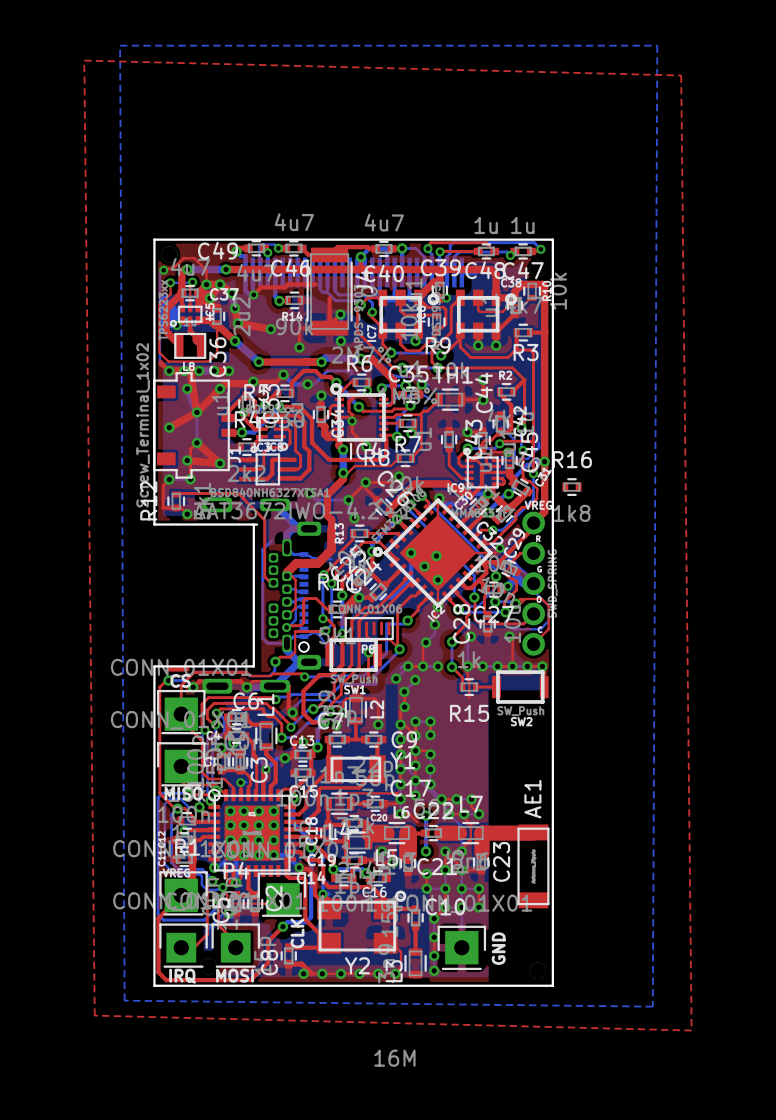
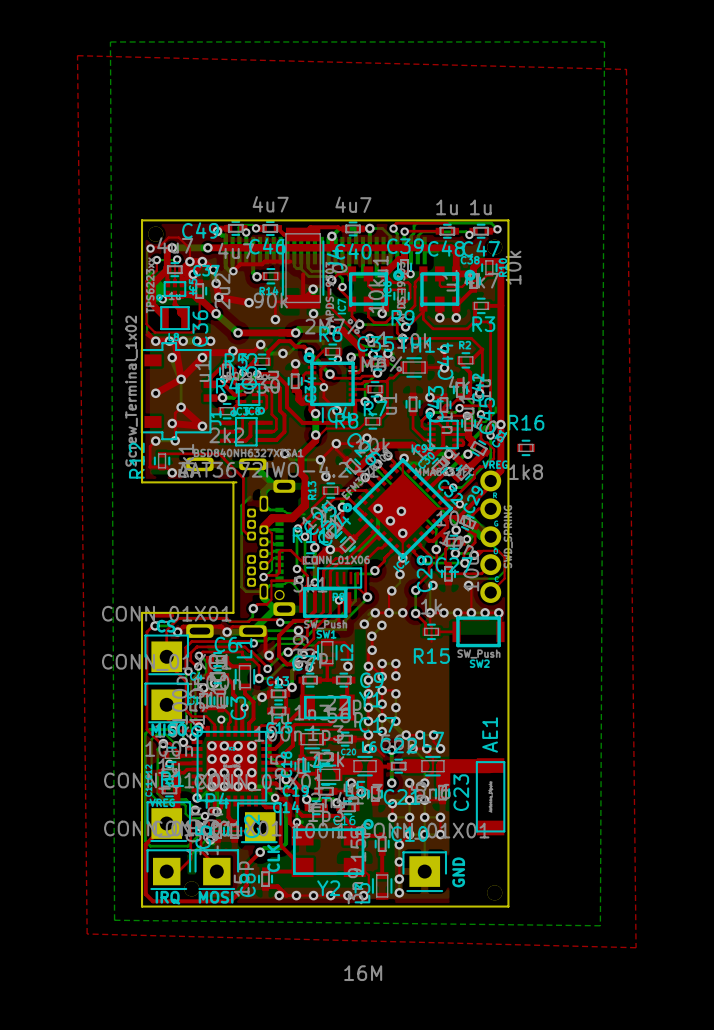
bottom track: none -> (265, 630) (298, 630)
via: none -> (298, 630)

